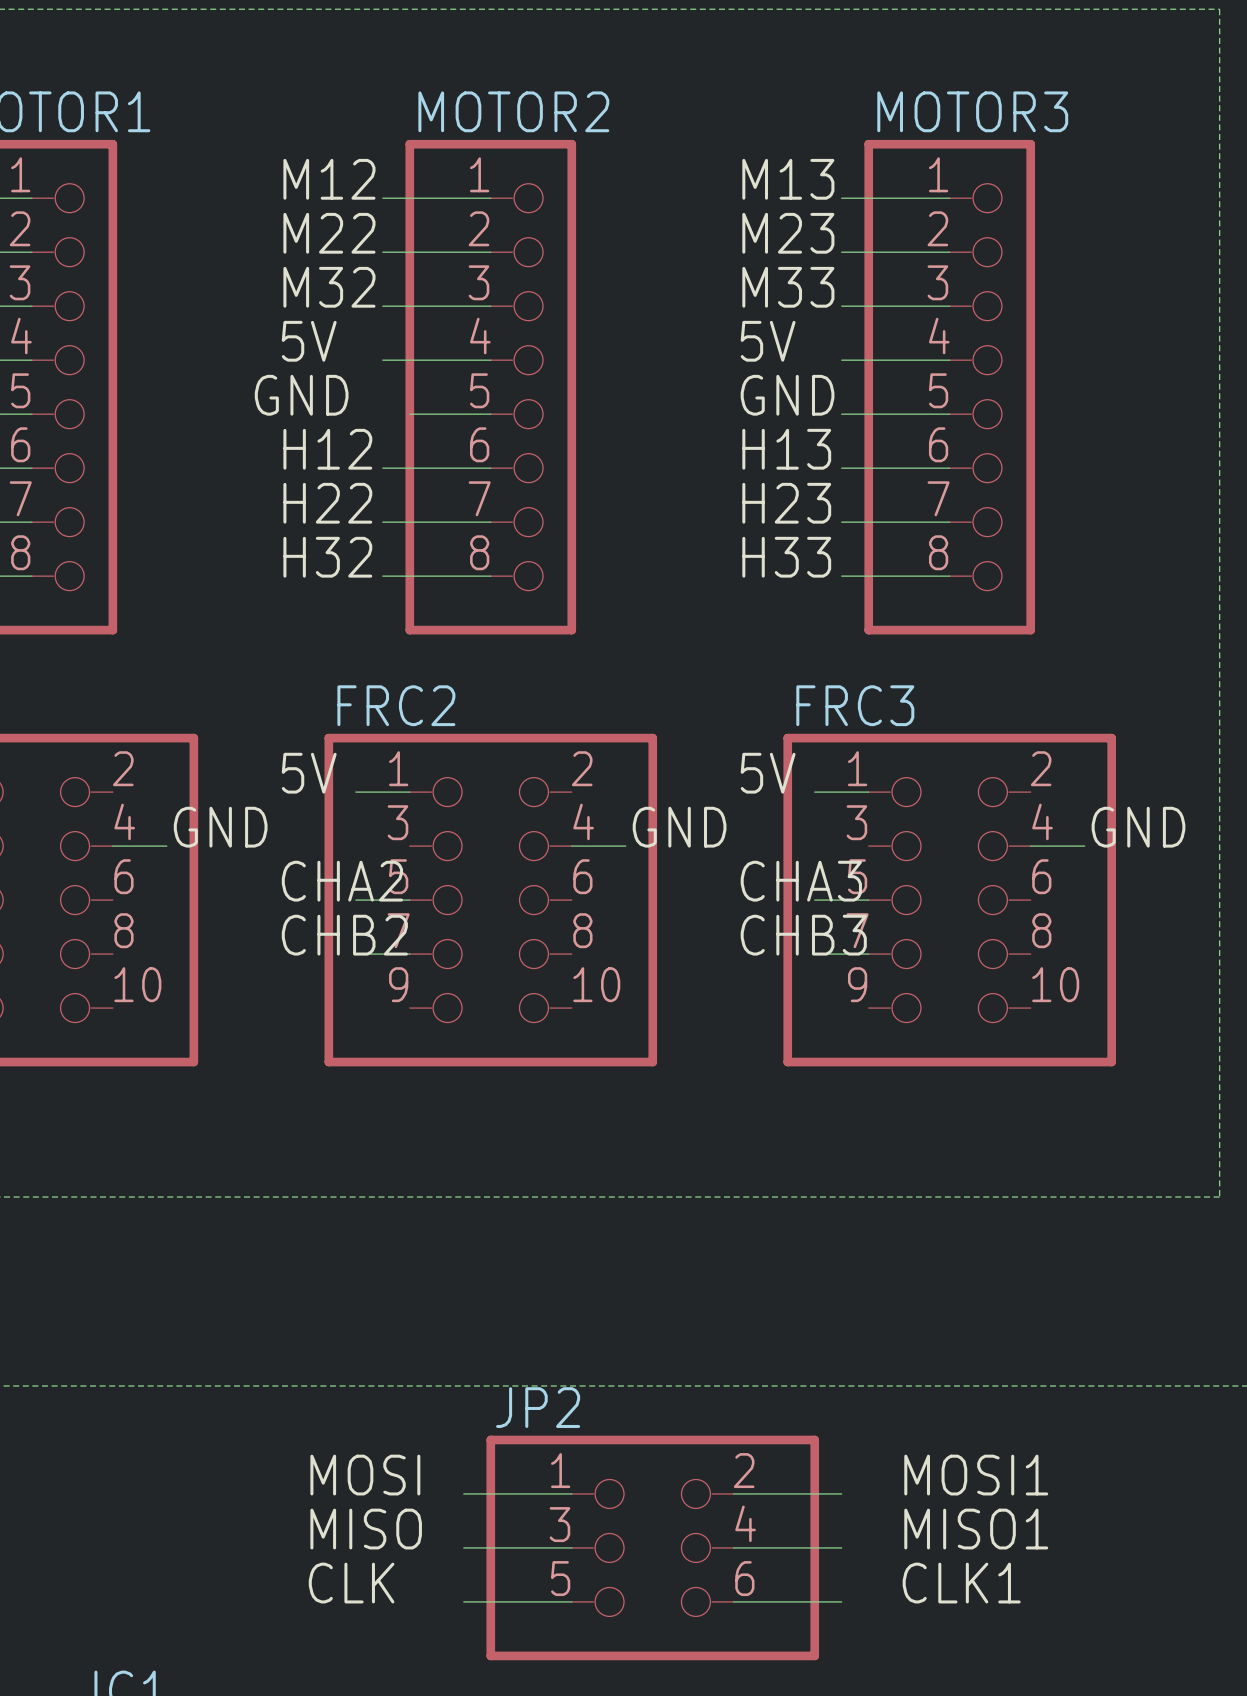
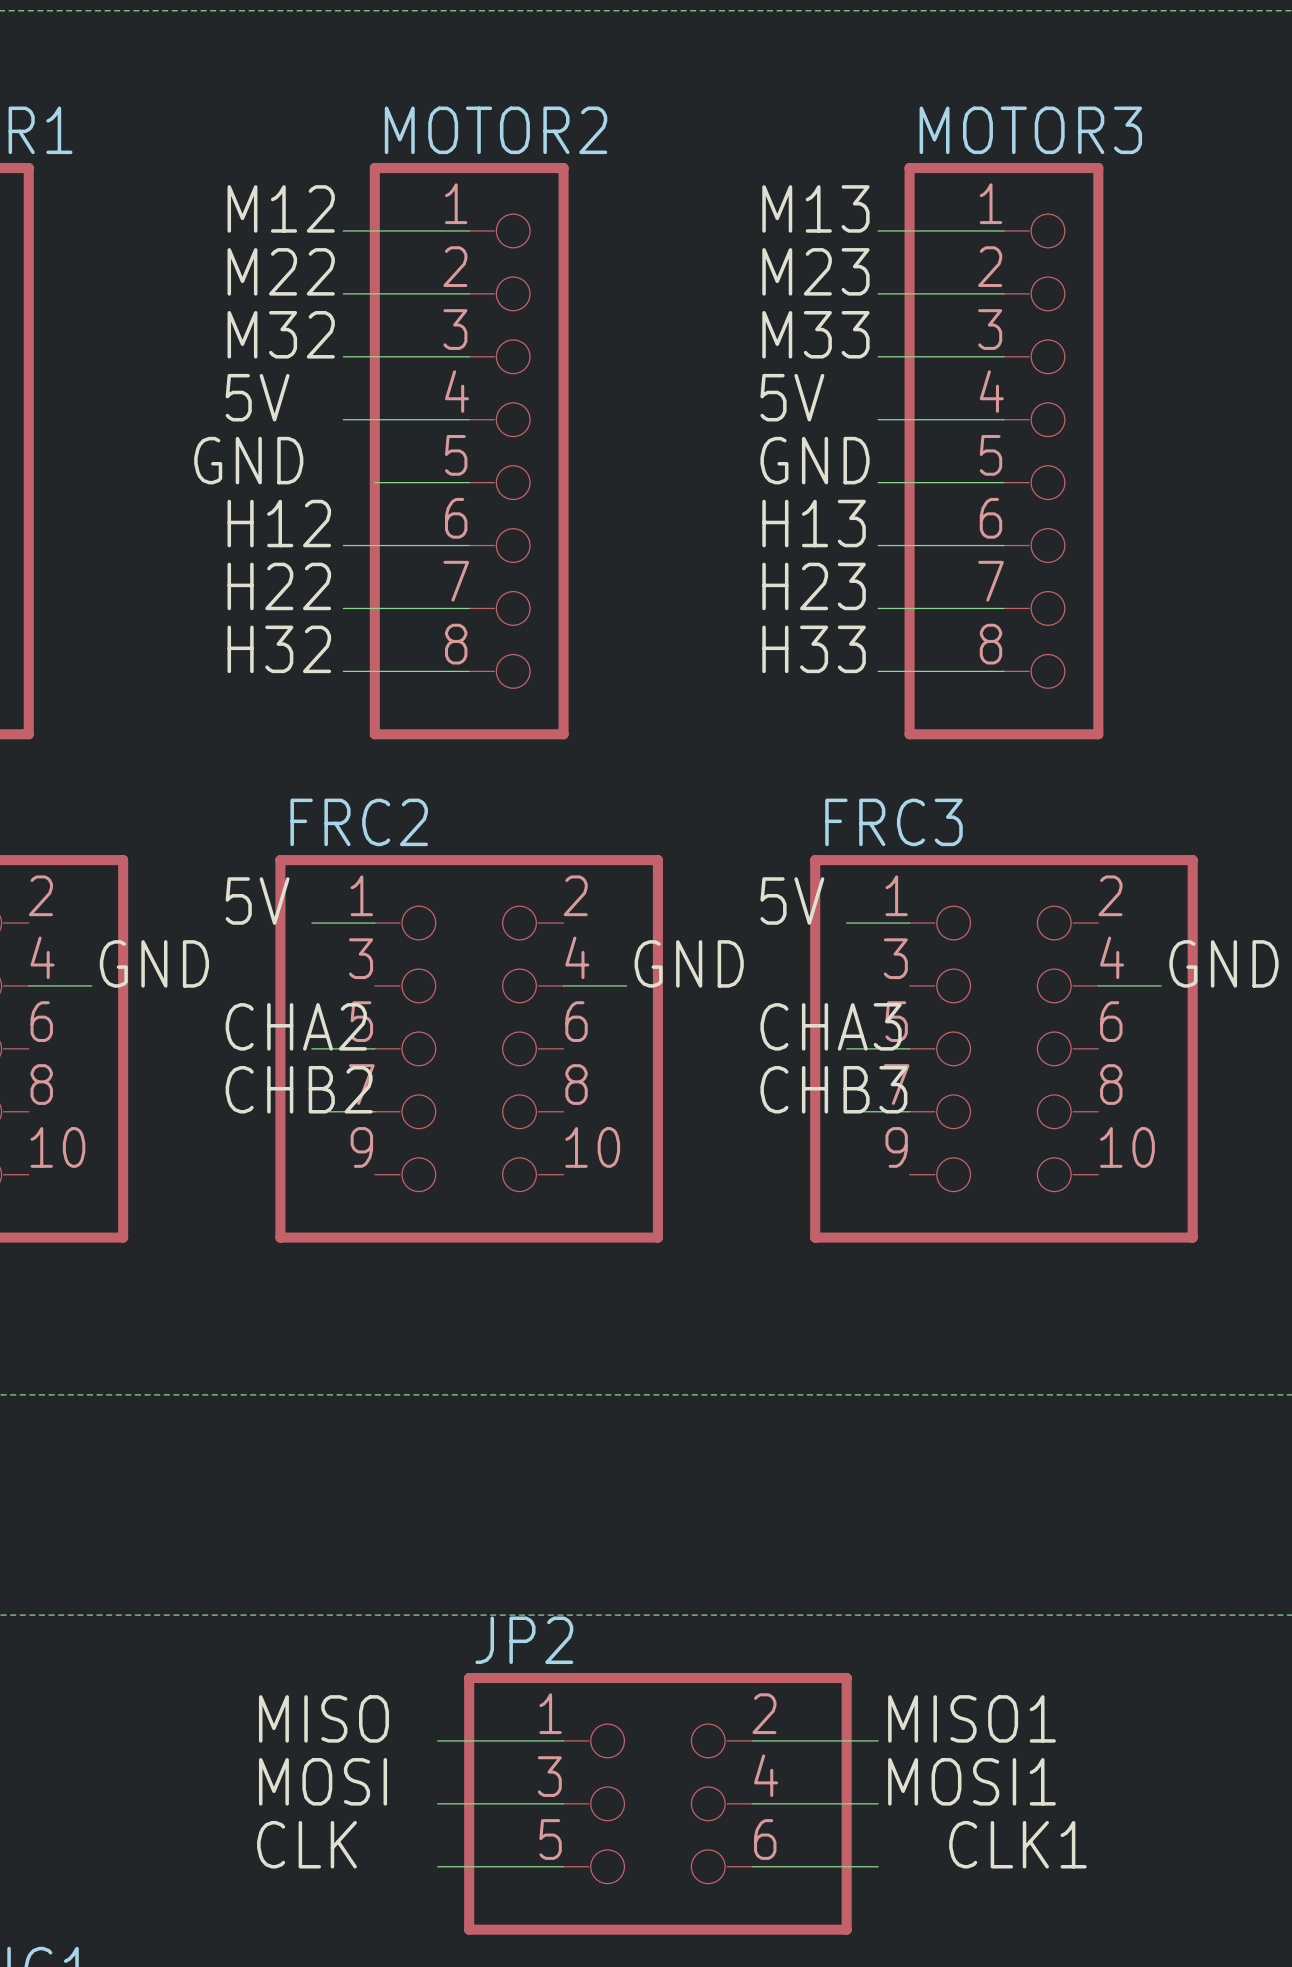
label: MOSI (365, 1475) -> MISO (323, 1718)
label position: MOSI1 (976, 1475) -> MOSI1 (971, 1781)
label: MISO (366, 1529) -> MOSI (323, 1781)
label position: MISO1 (976, 1529) -> MISO1 (971, 1718)

